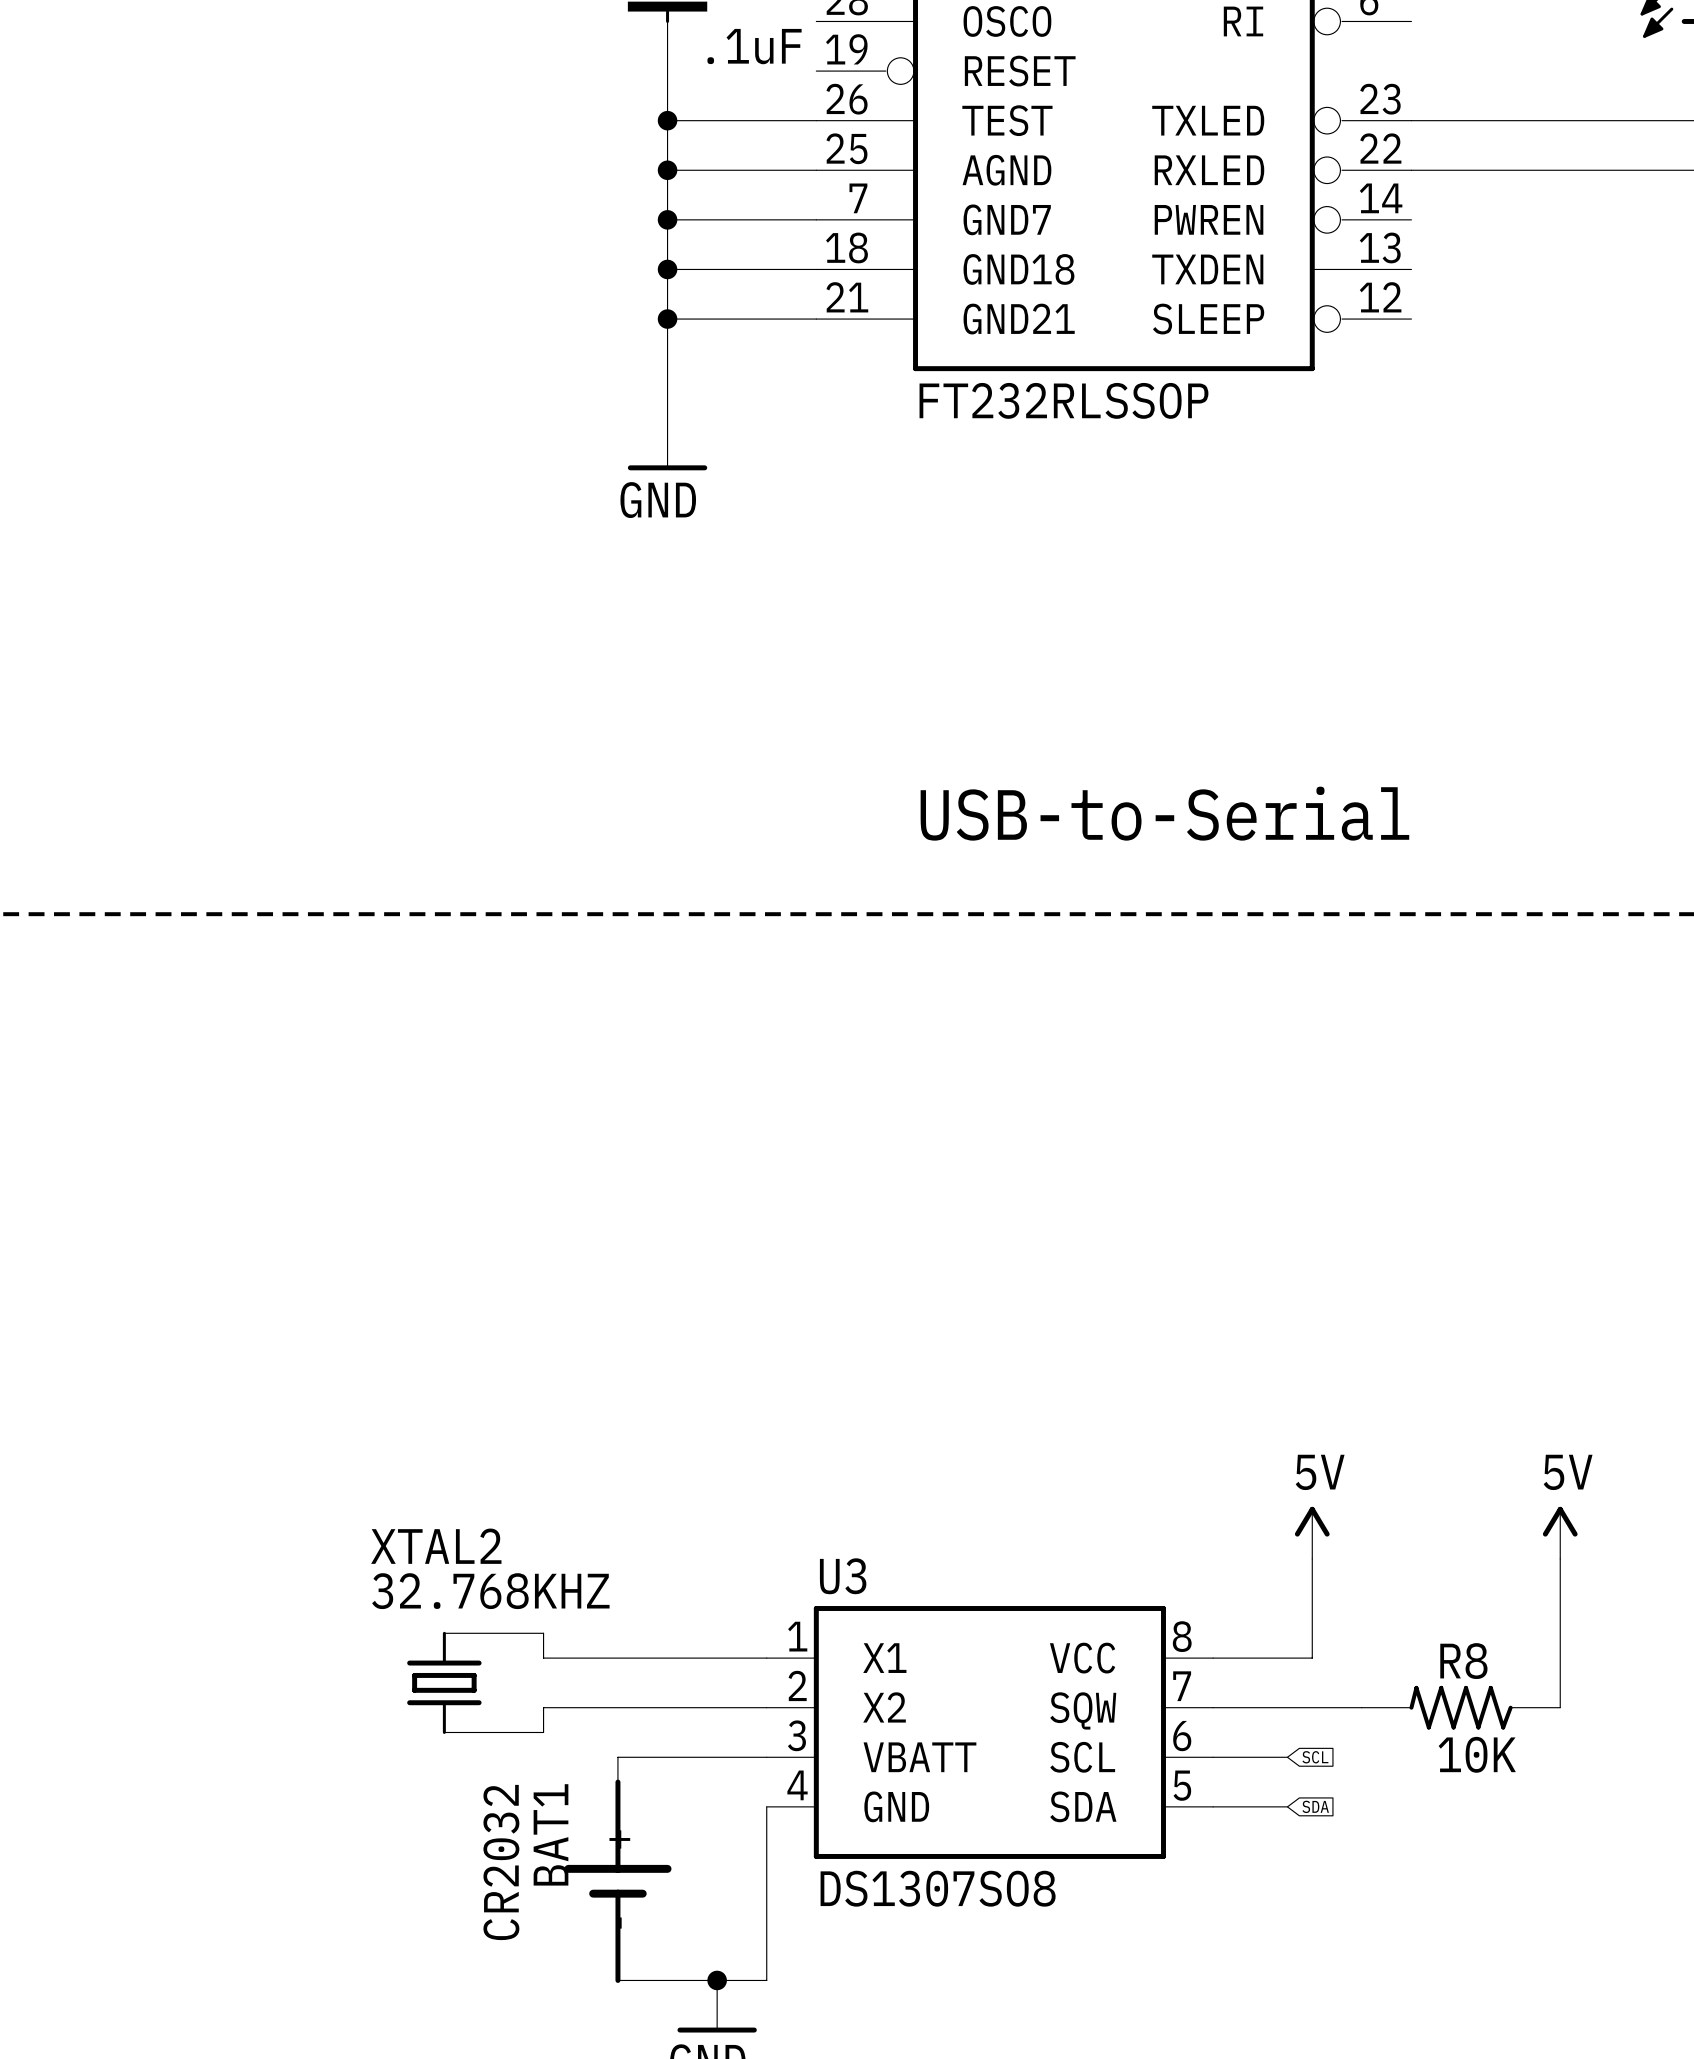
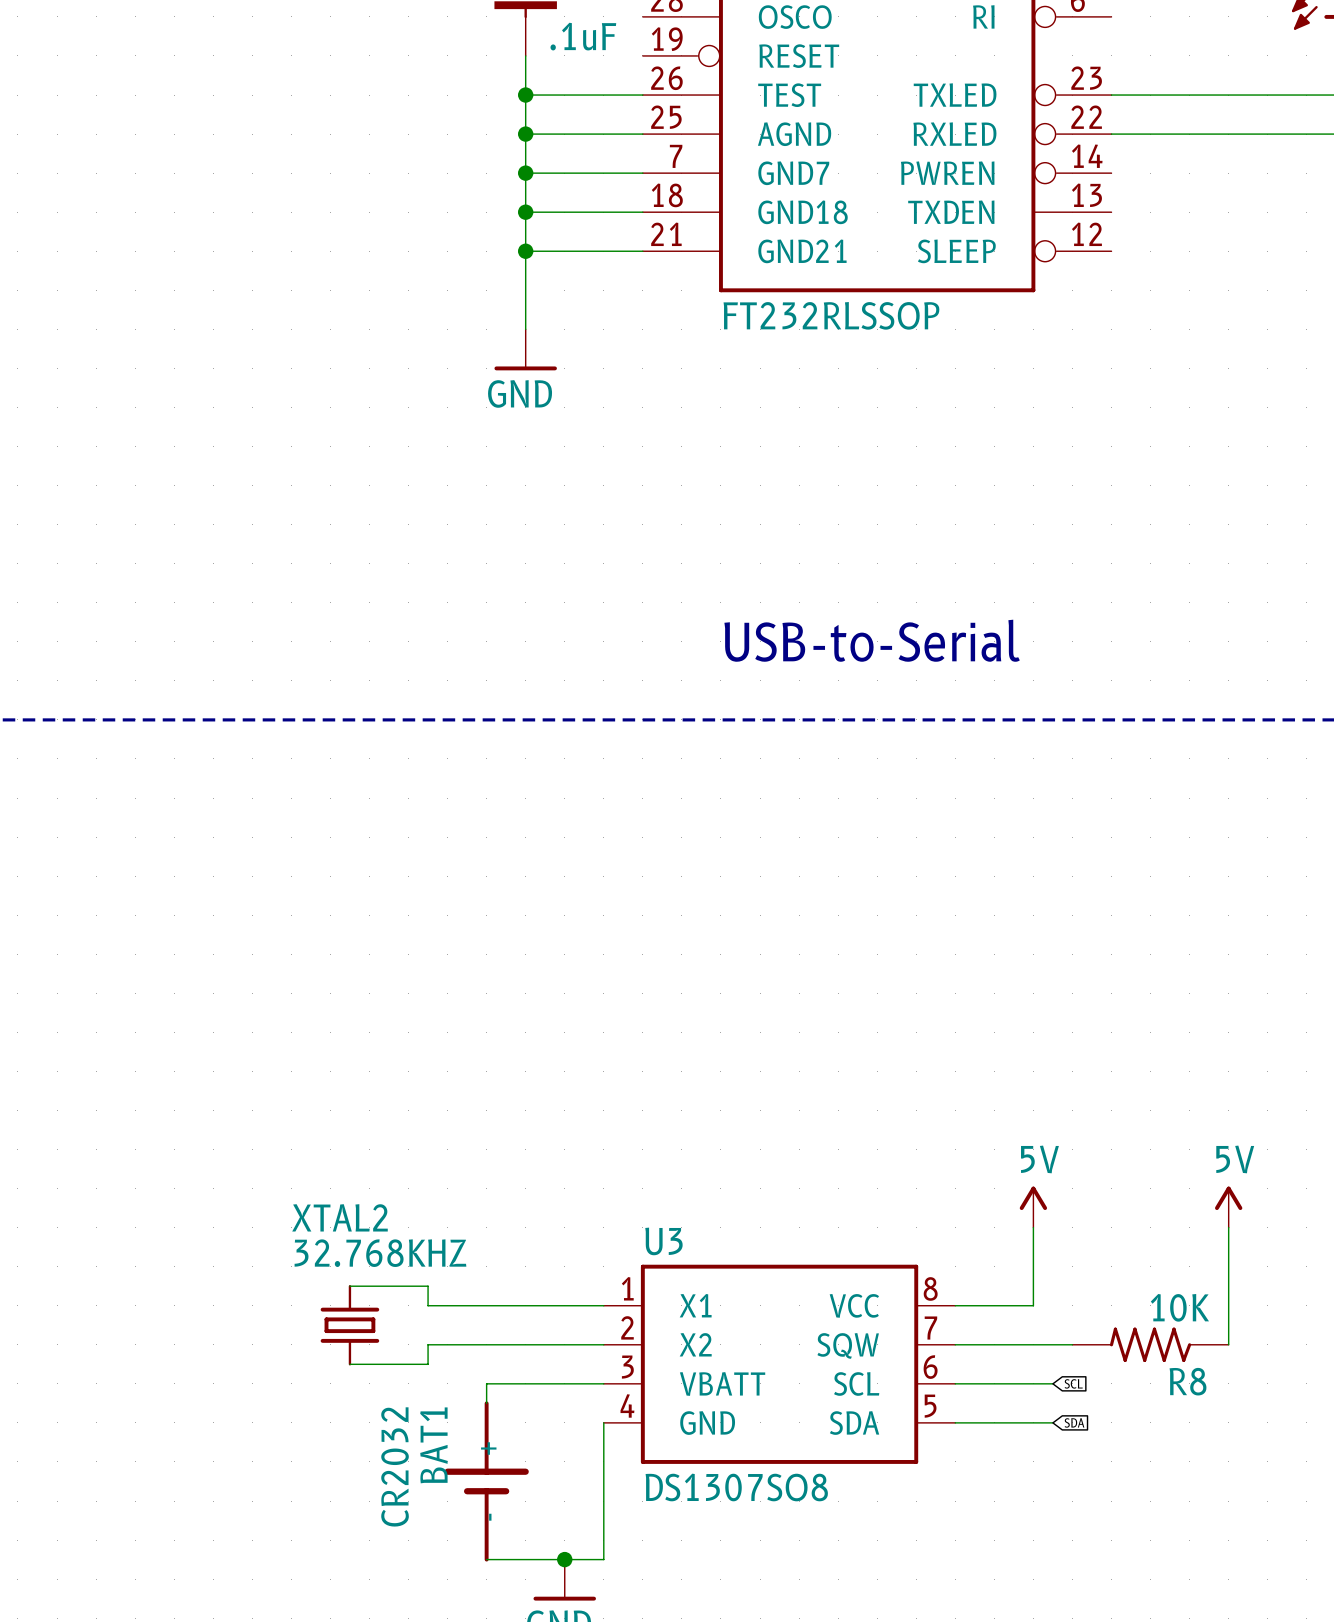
R8 name position: R8 (1463, 1661) -> R8 (1188, 1381)
R8 value position: 10K (1477, 1754) -> 10K (1179, 1307)
wire: none -> (1013, 1383) (1052, 1383)
global label position: SCL (1315, 1757) -> SCL (1073, 1383)
wire: none -> (1013, 1422) (1052, 1422)
global label position: SDA (1315, 1806) -> SDA (1074, 1422)

